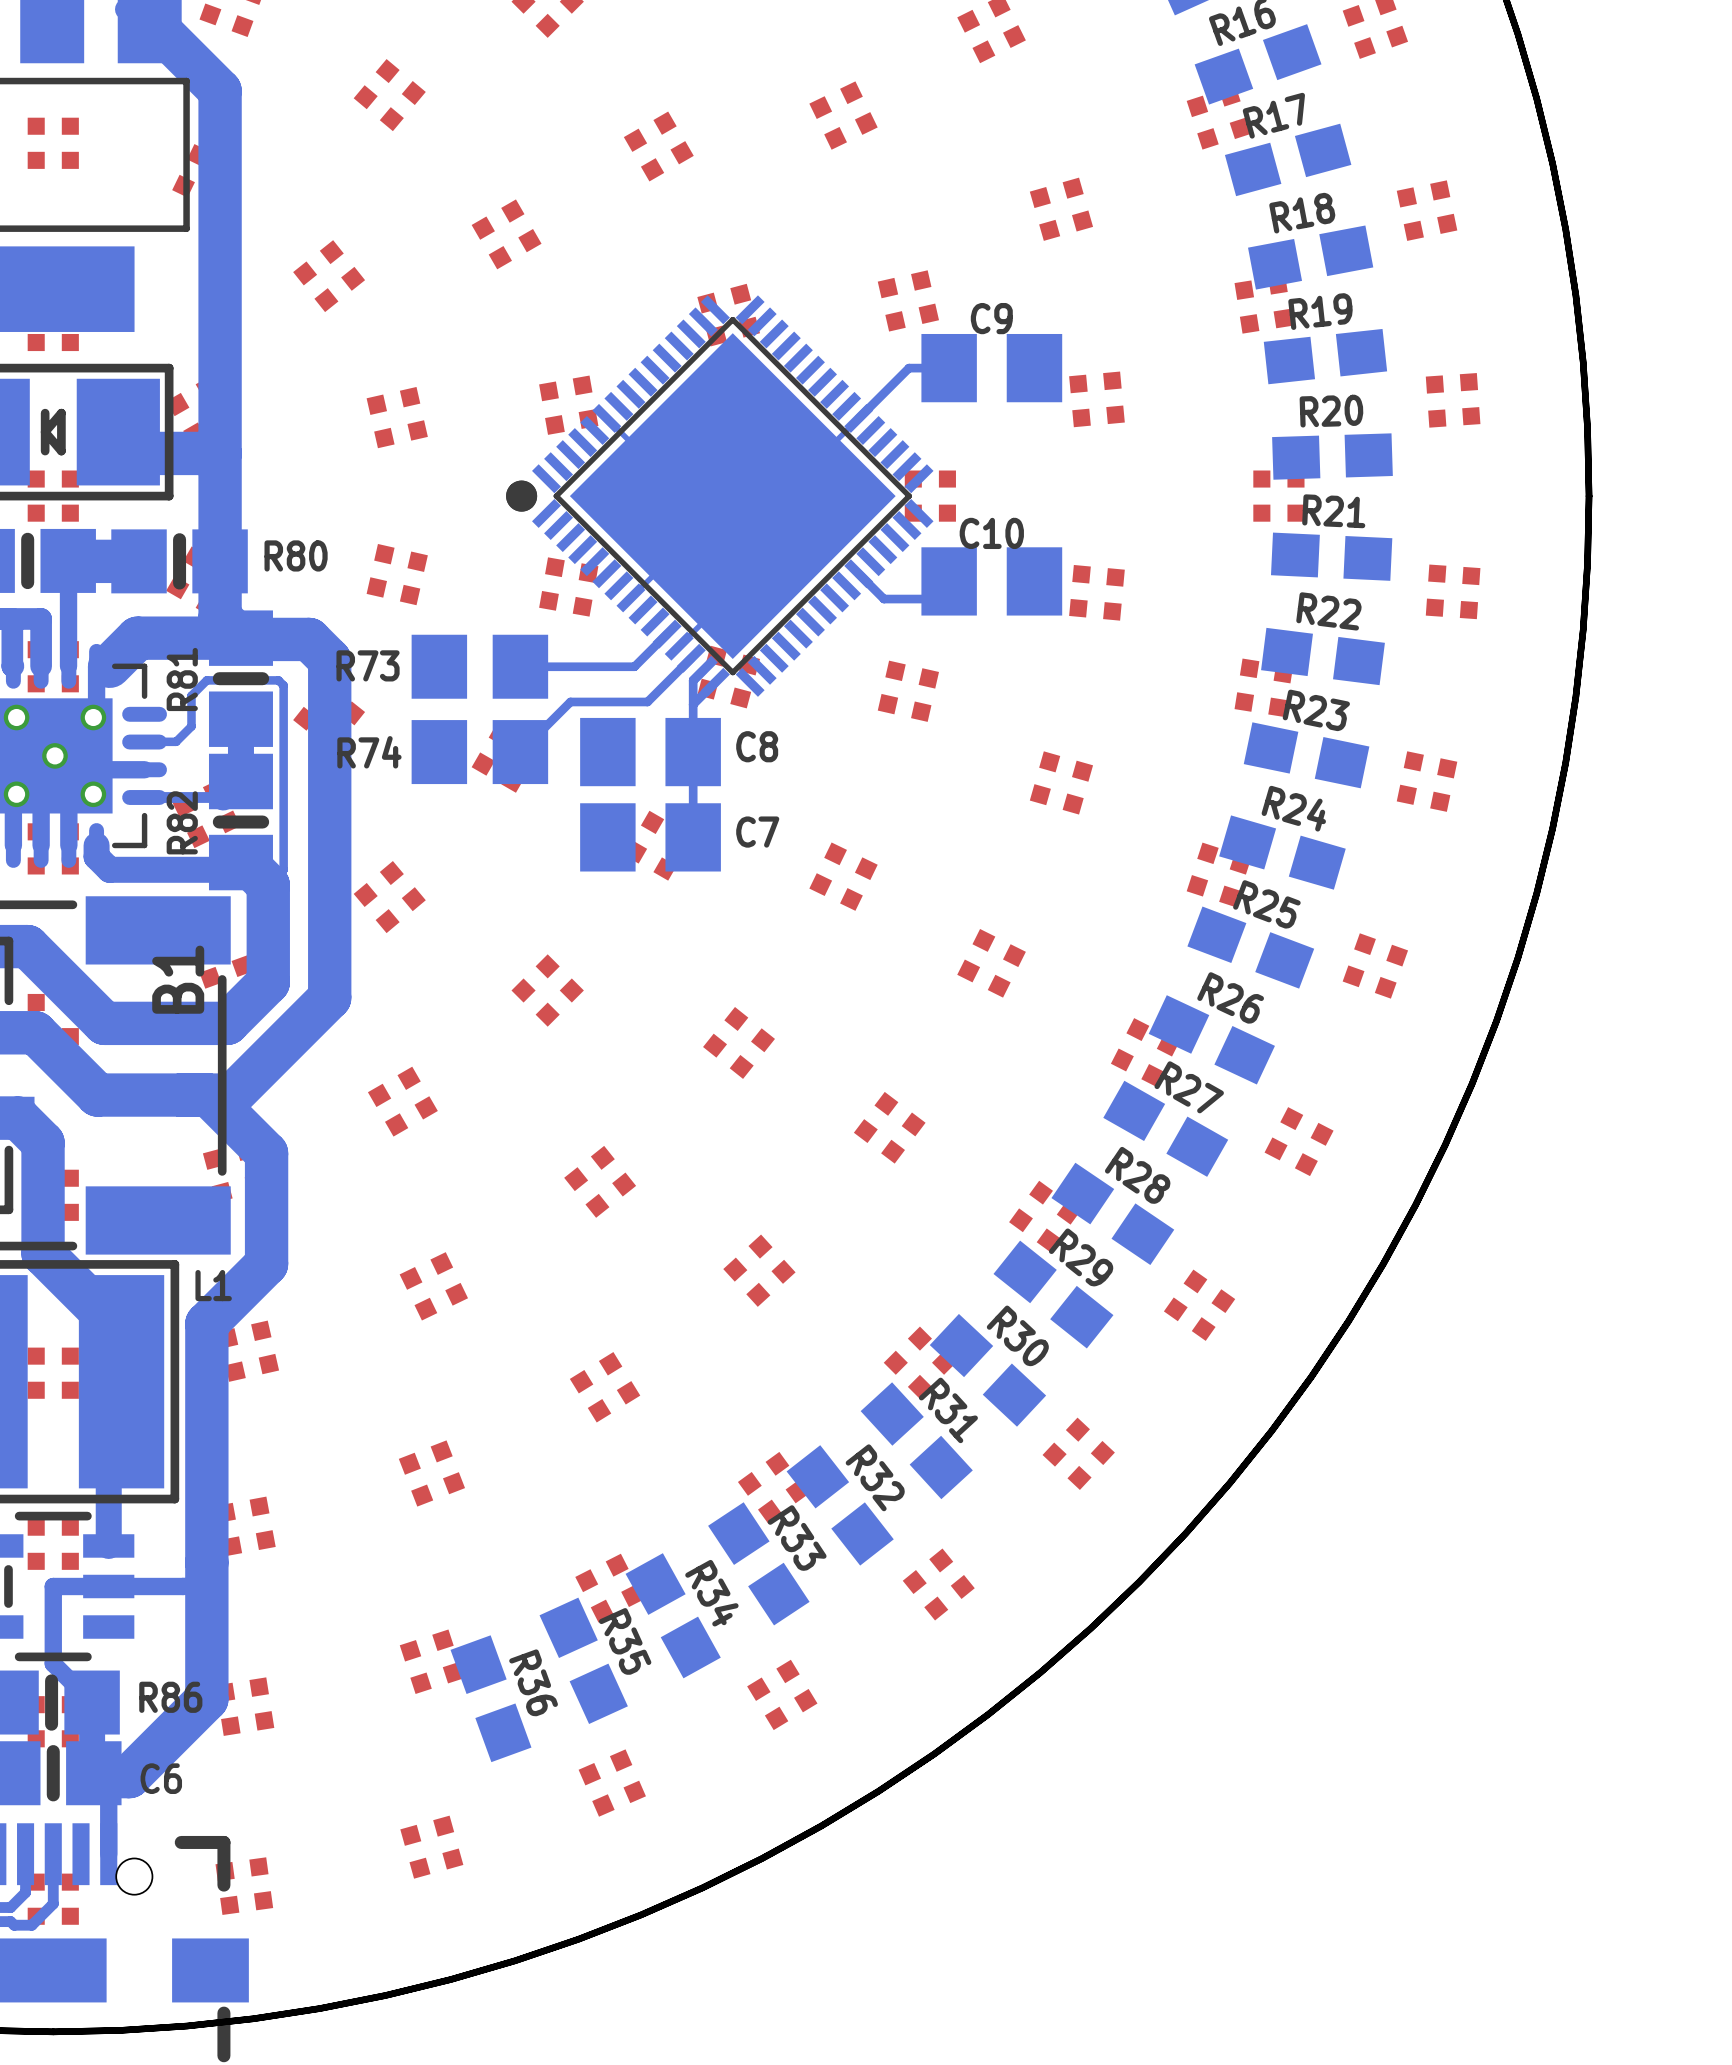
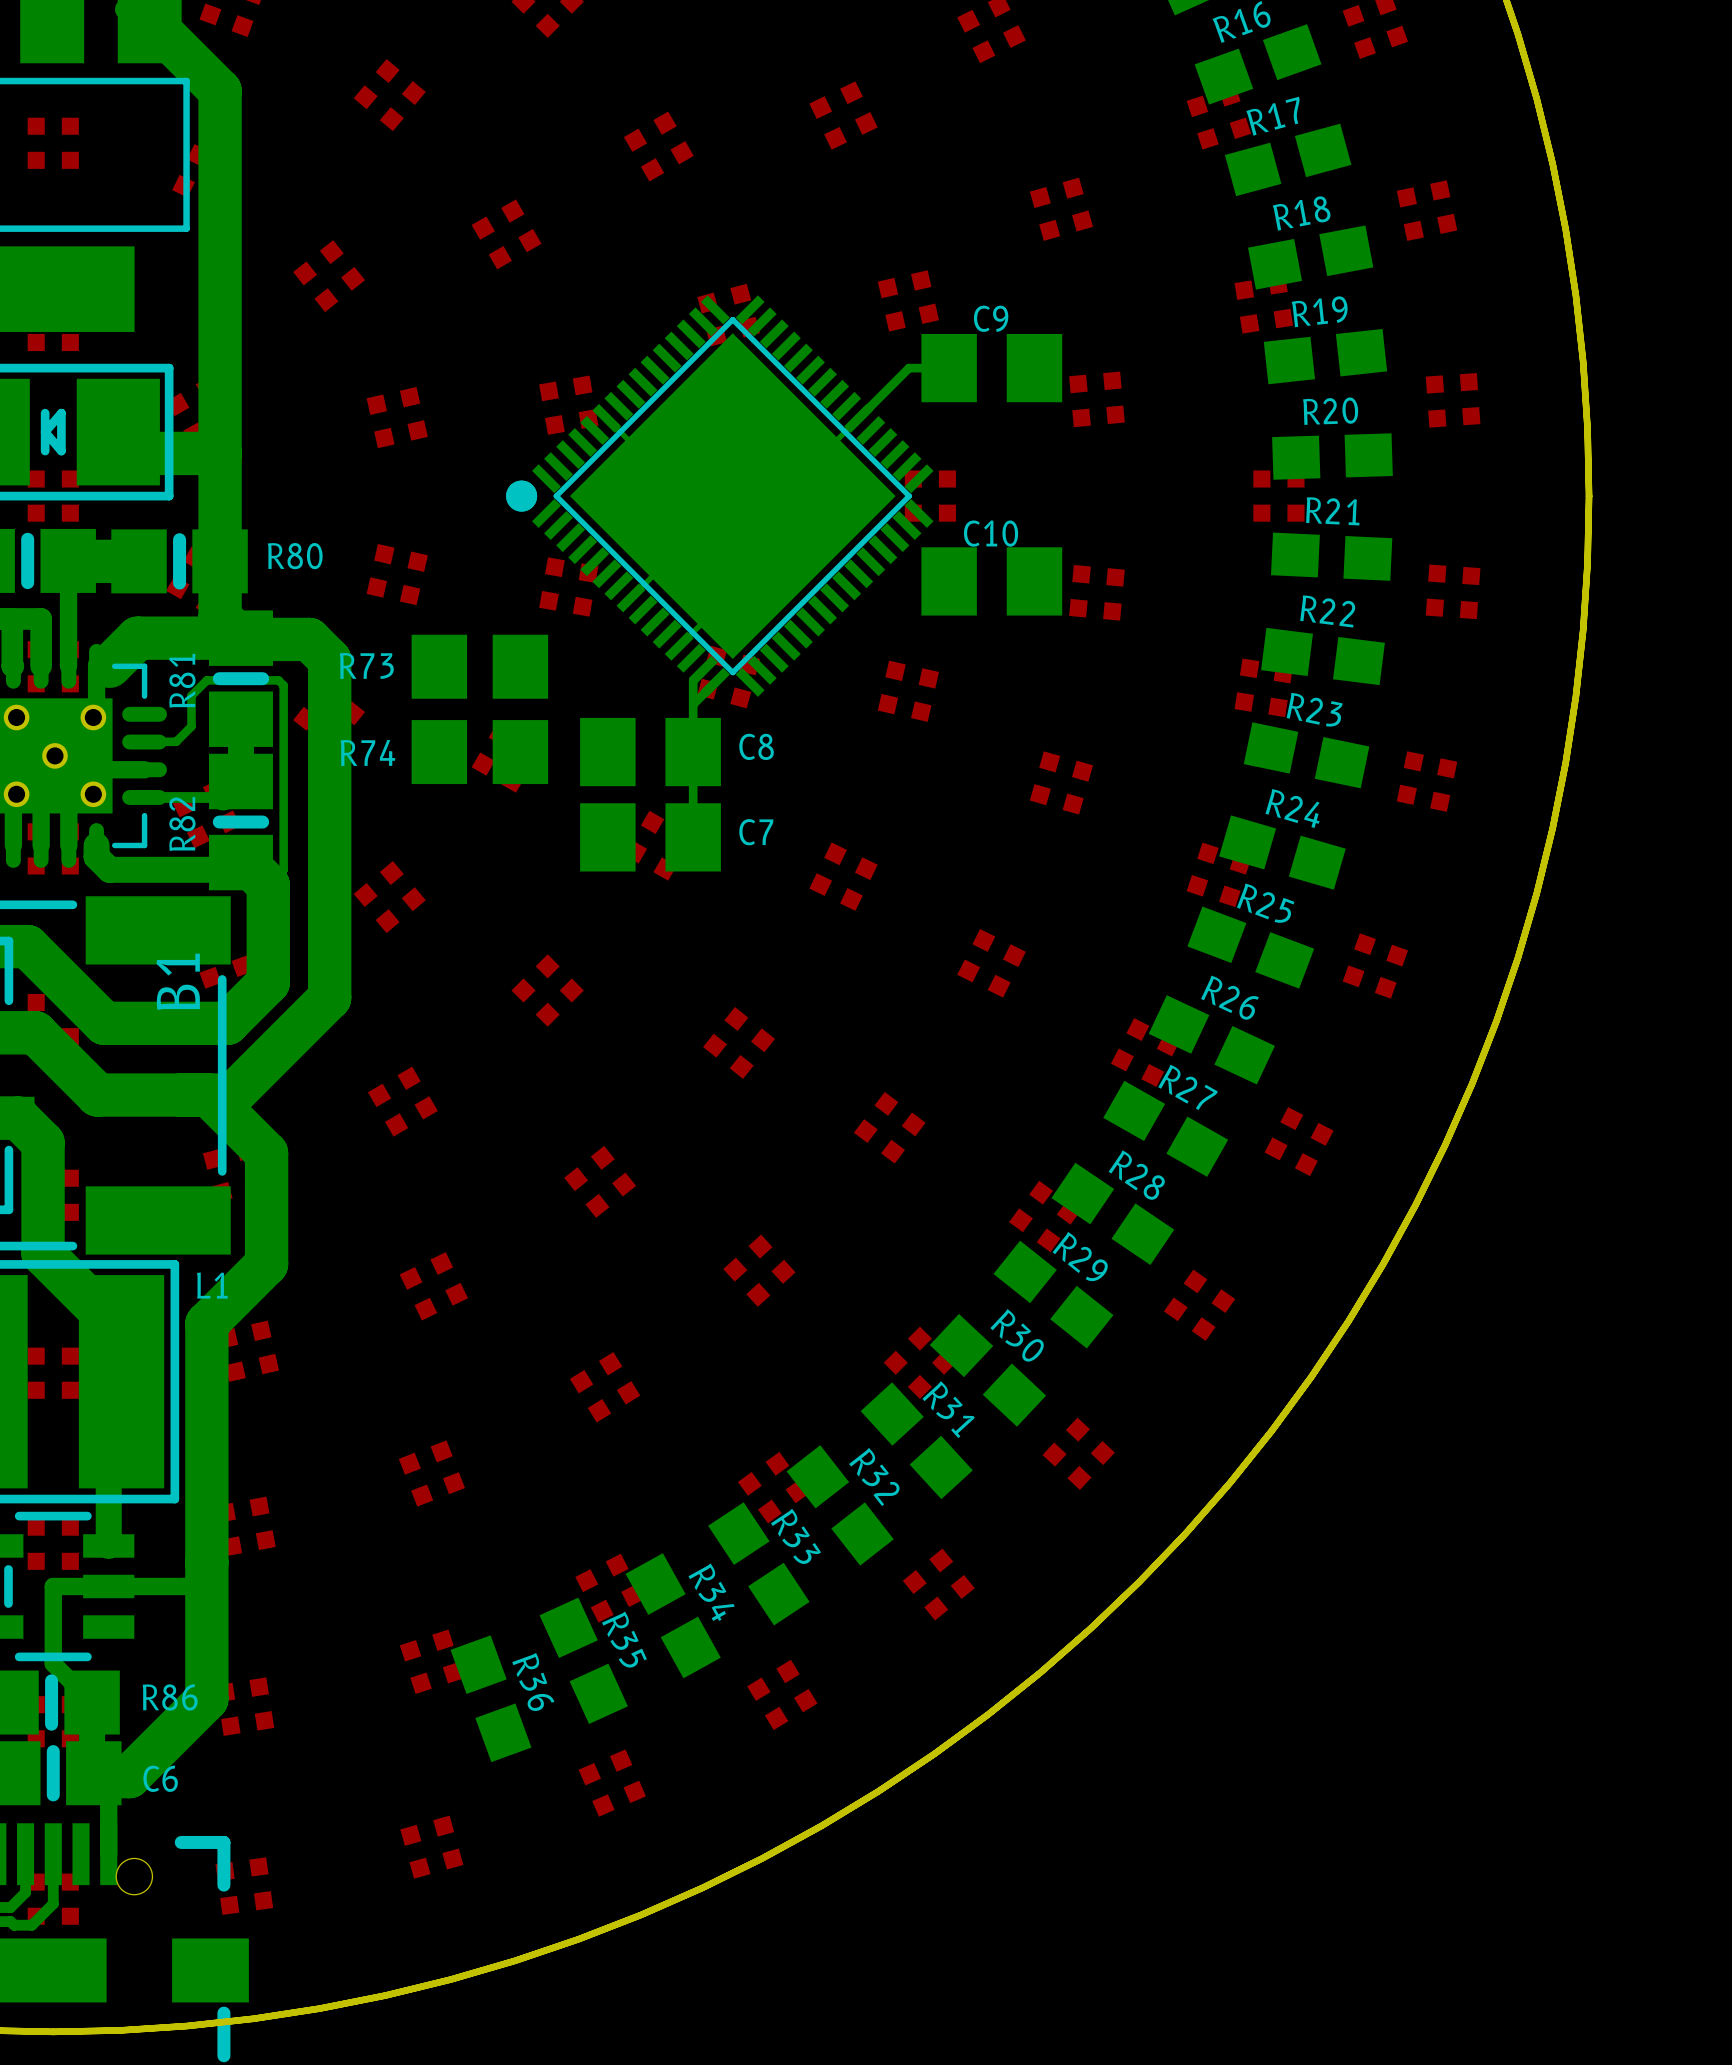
bottom track: (858, 573) (883, 599) (931, 599) (949, 581) -> none
bottom track: (667, 634) (634, 666) (520, 666) -> none
bottom track: (691, 658) (647, 701) (570, 701) (520, 752) -> none

